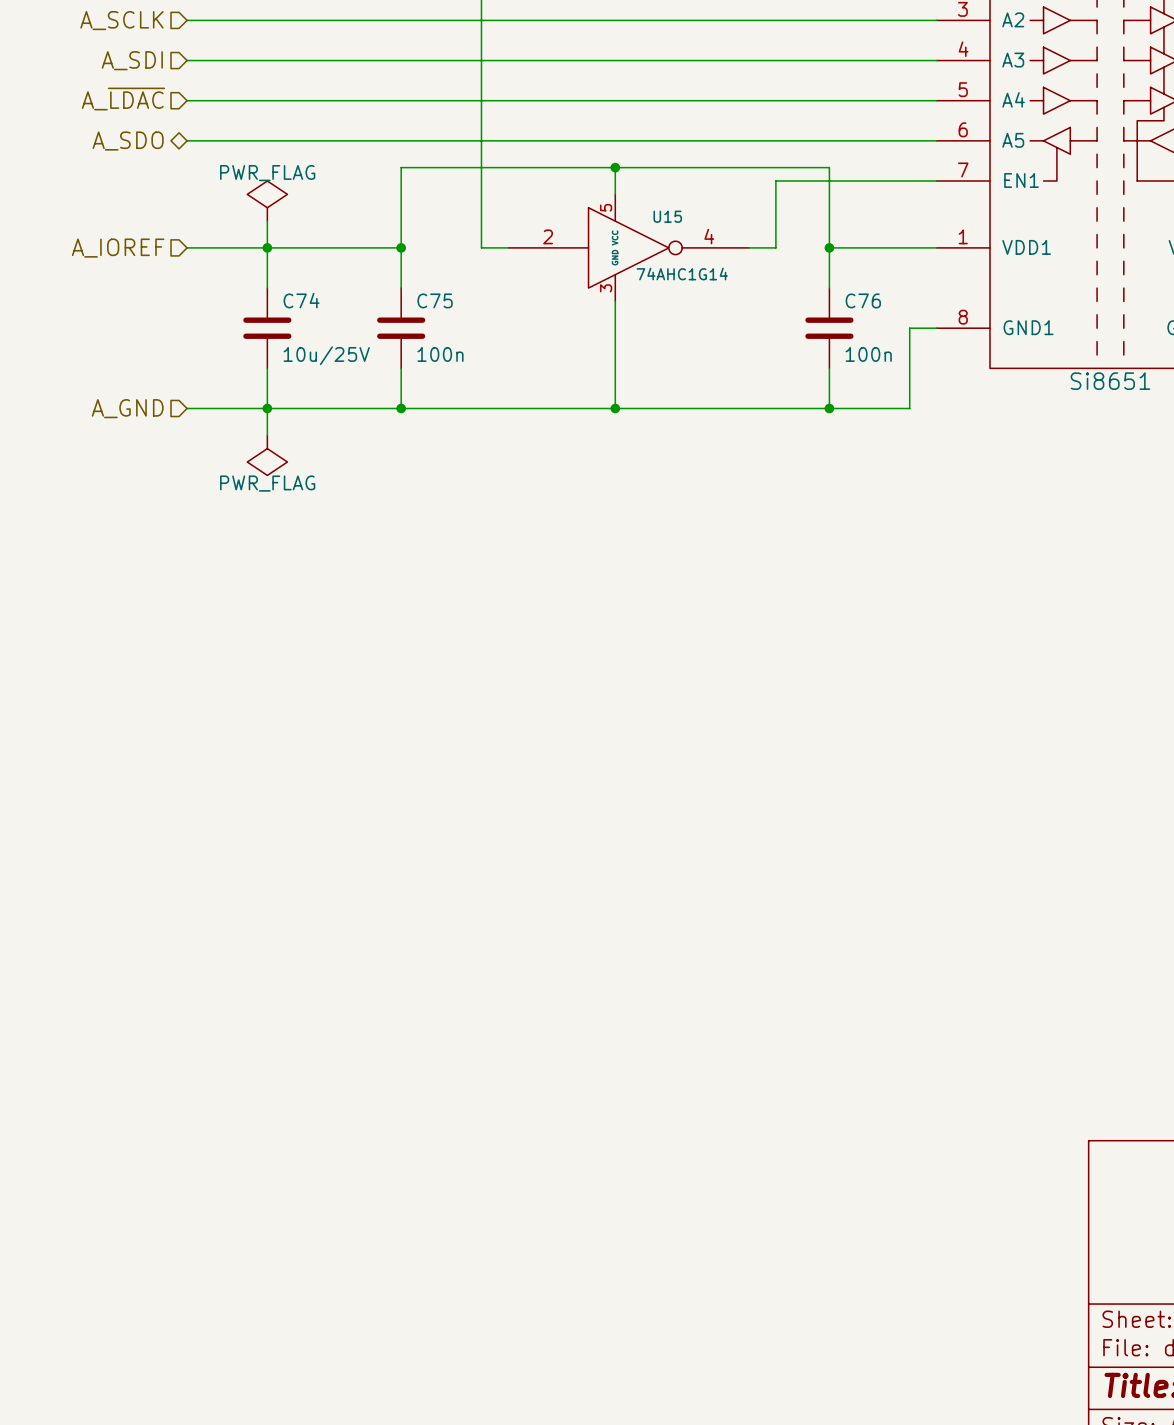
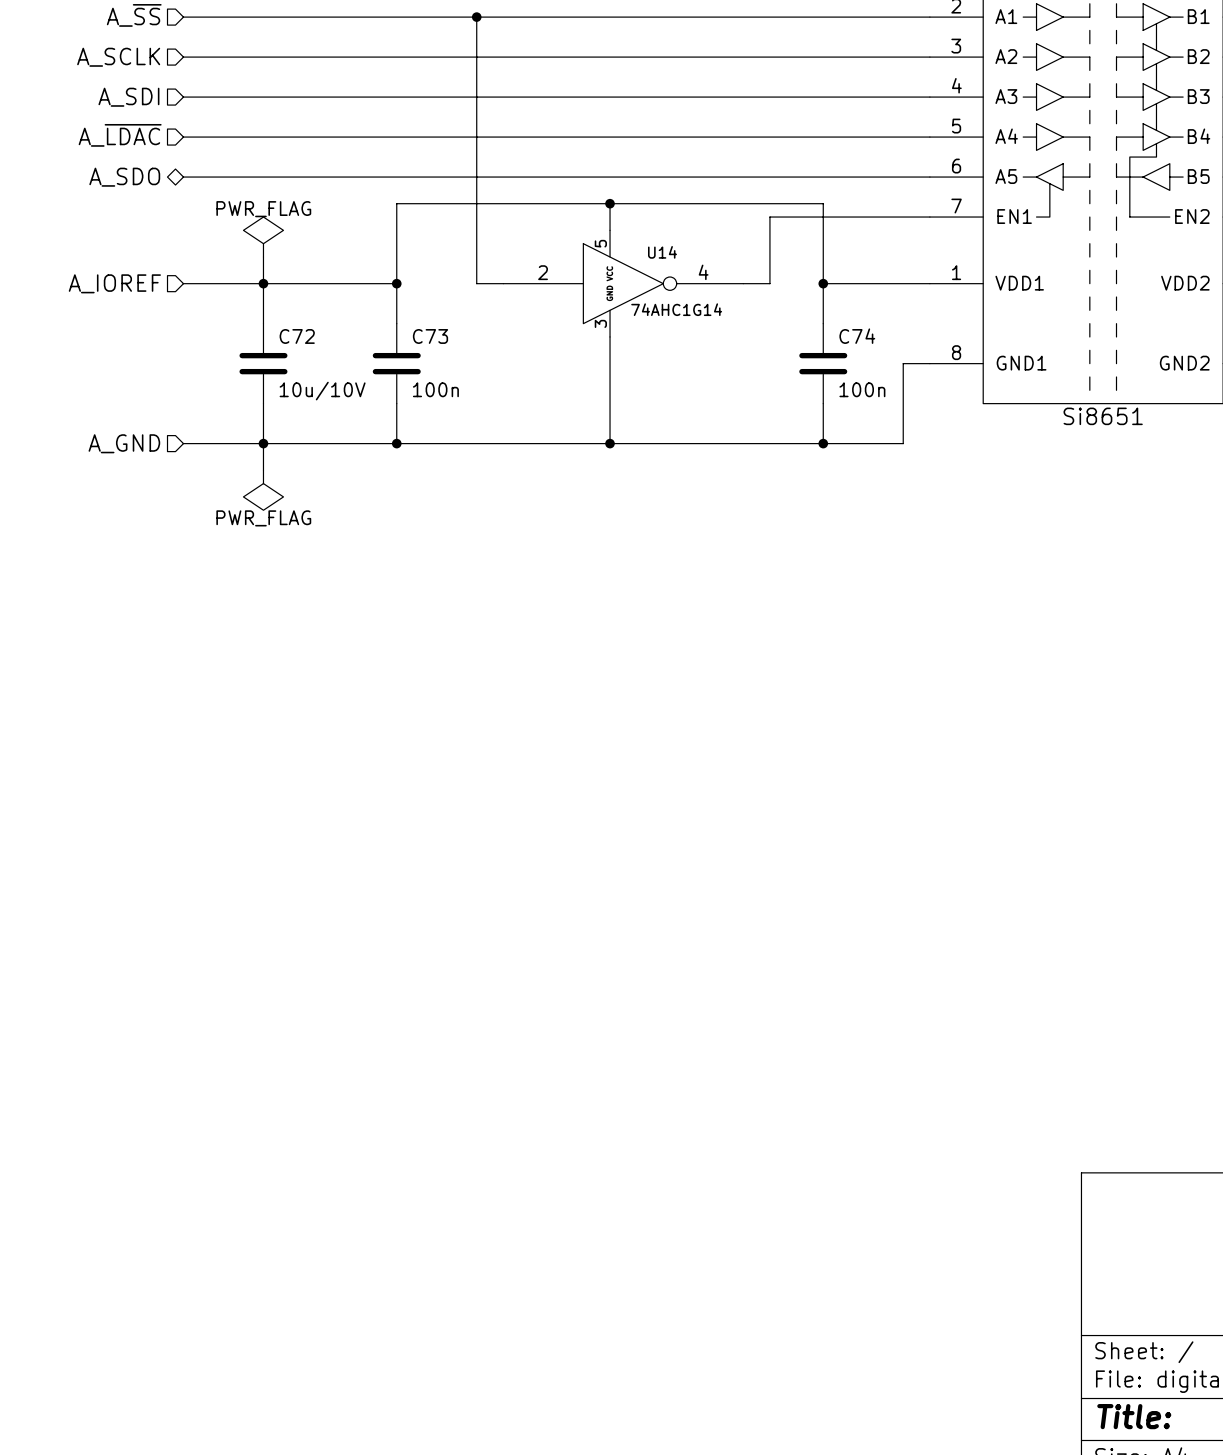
U15 name: U15 (667, 216) -> U14 (662, 252)
C74 name: C74 (301, 300) -> C72 (297, 336)
C75 name: C75 (435, 300) -> C73 (430, 336)
C76 name: C76 (863, 300) -> C74 (857, 336)
C74 value: 10u/25V (326, 355) -> 10u/10V (322, 391)

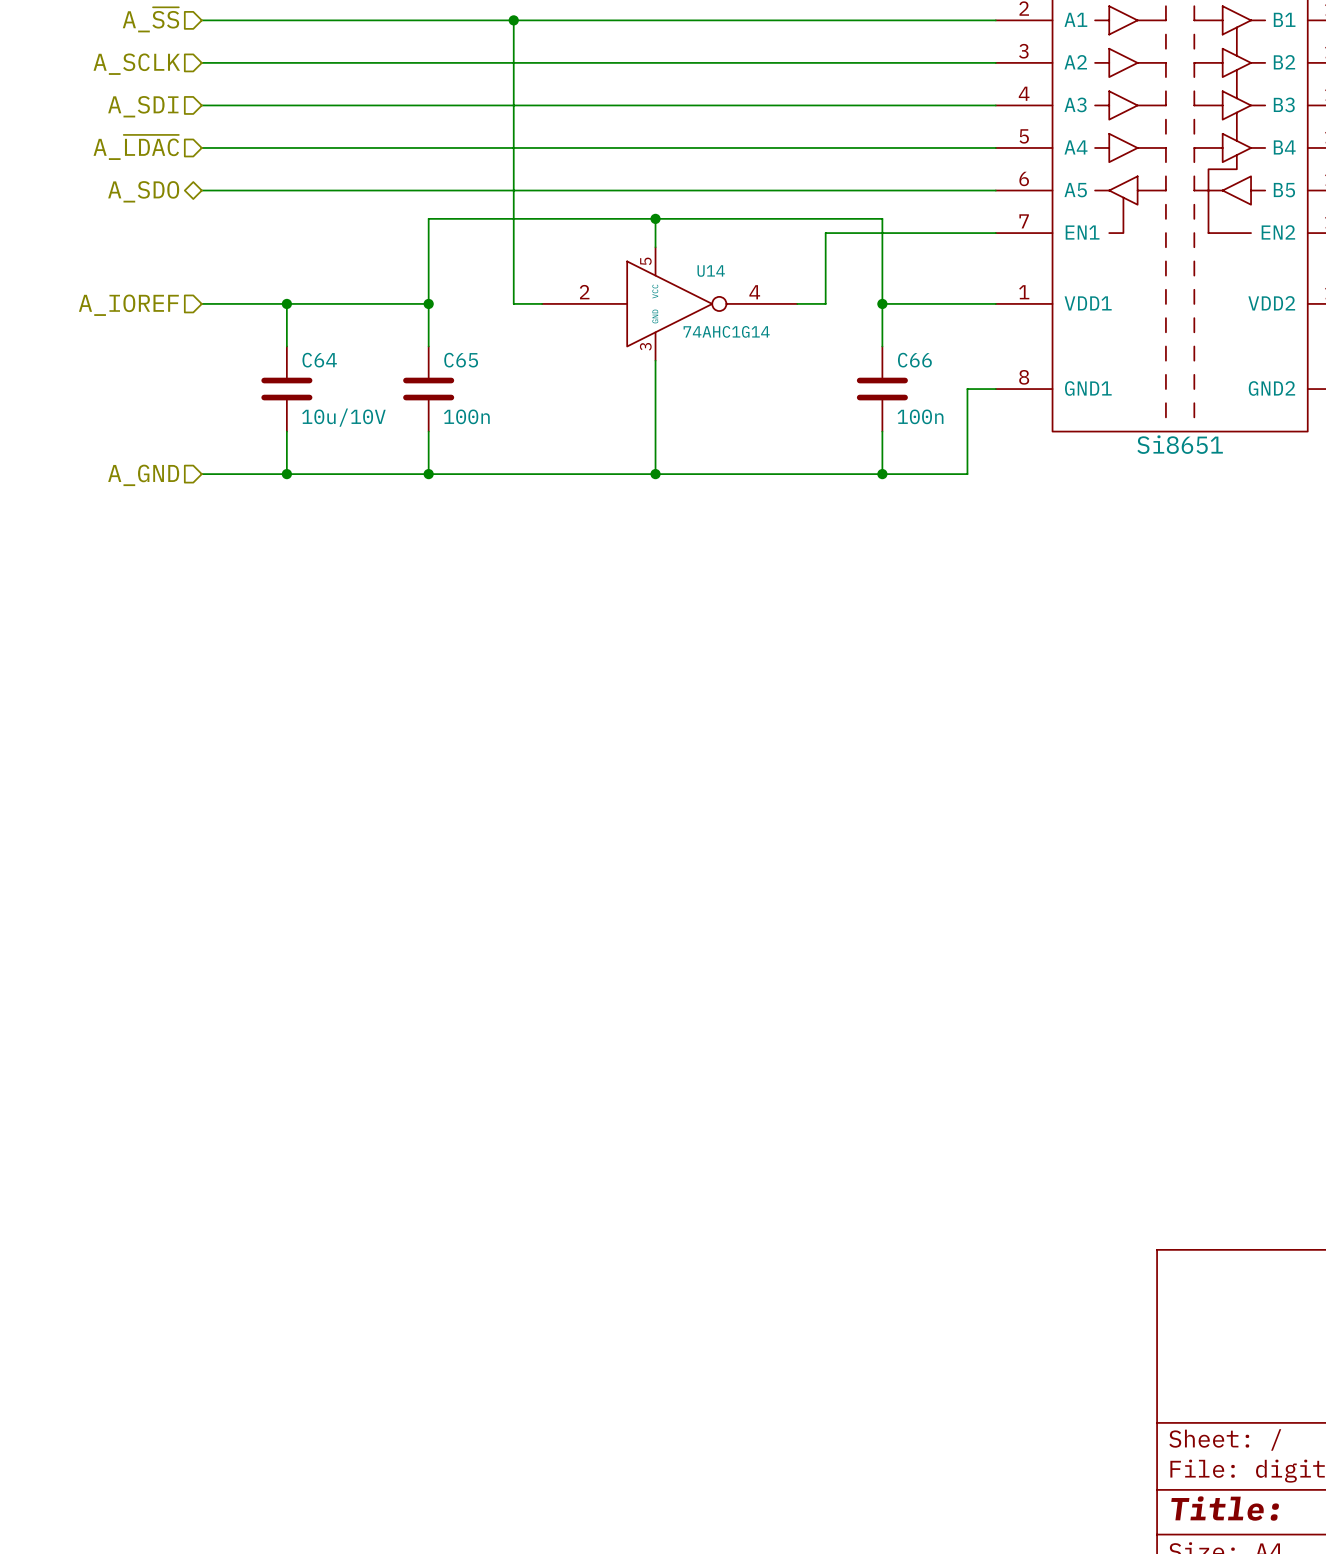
power symbol: PWR_FLAG (263, 237) -> none
wire: (263, 257) (263, 283) -> none
C72 name: C72 (297, 336) -> C64 (319, 360)
C73 name: C73 (430, 336) -> C65 (461, 360)
C74 name: C74 (857, 336) -> C66 (914, 360)
wire: (263, 443) (263, 470) -> none
power symbol: PWR_FLAG (263, 490) -> none

